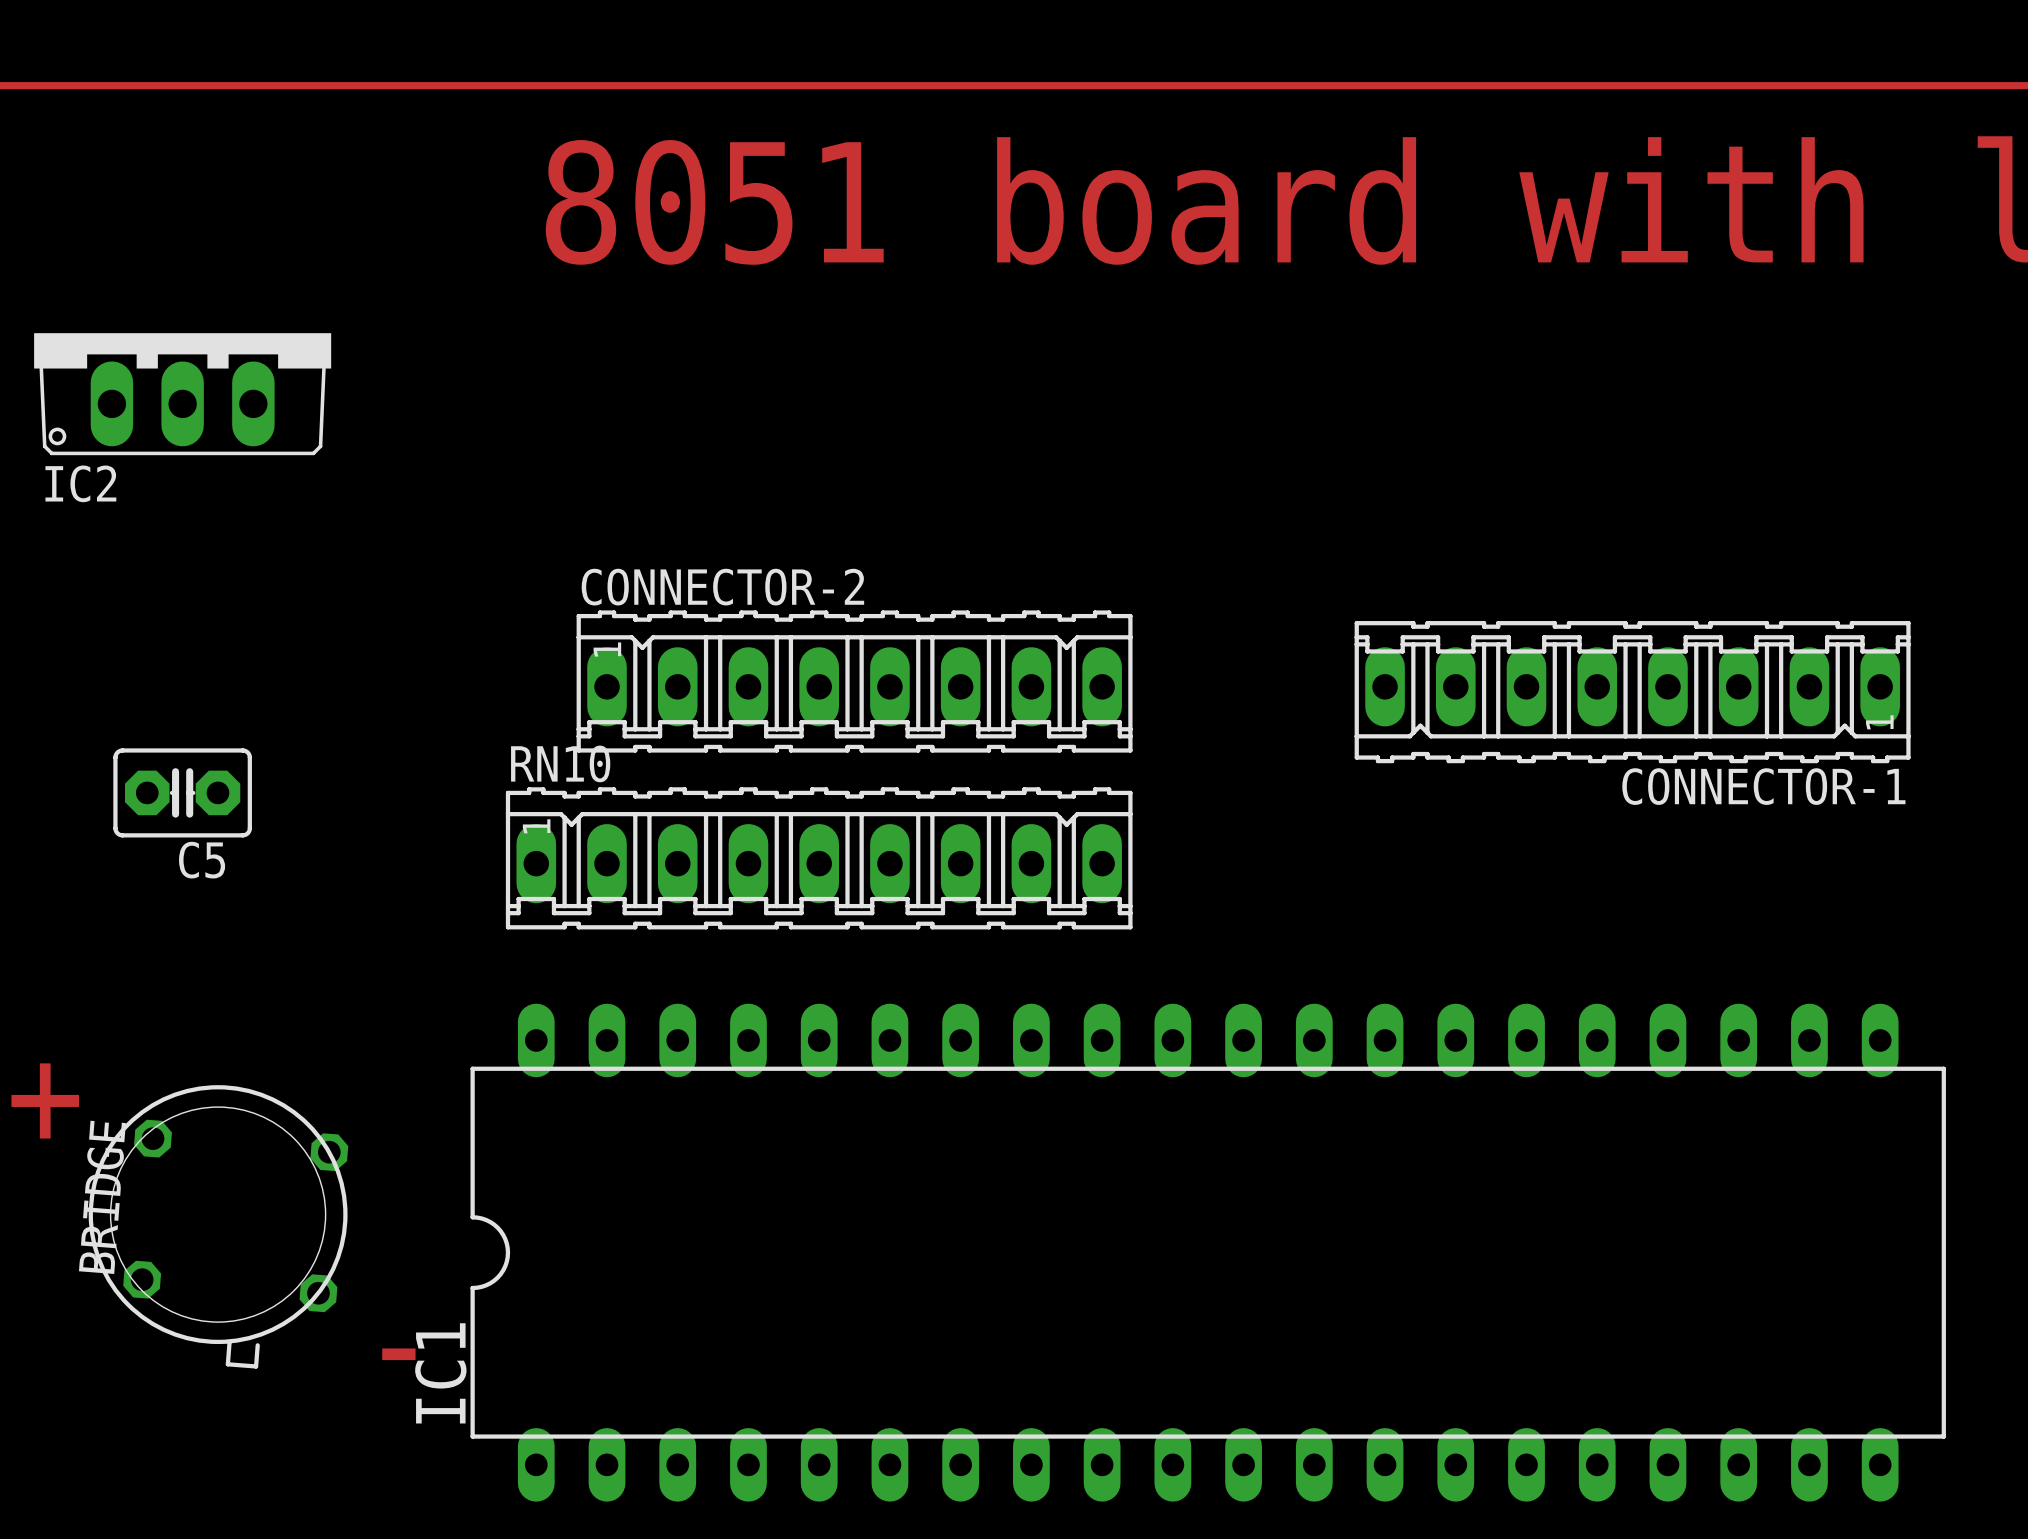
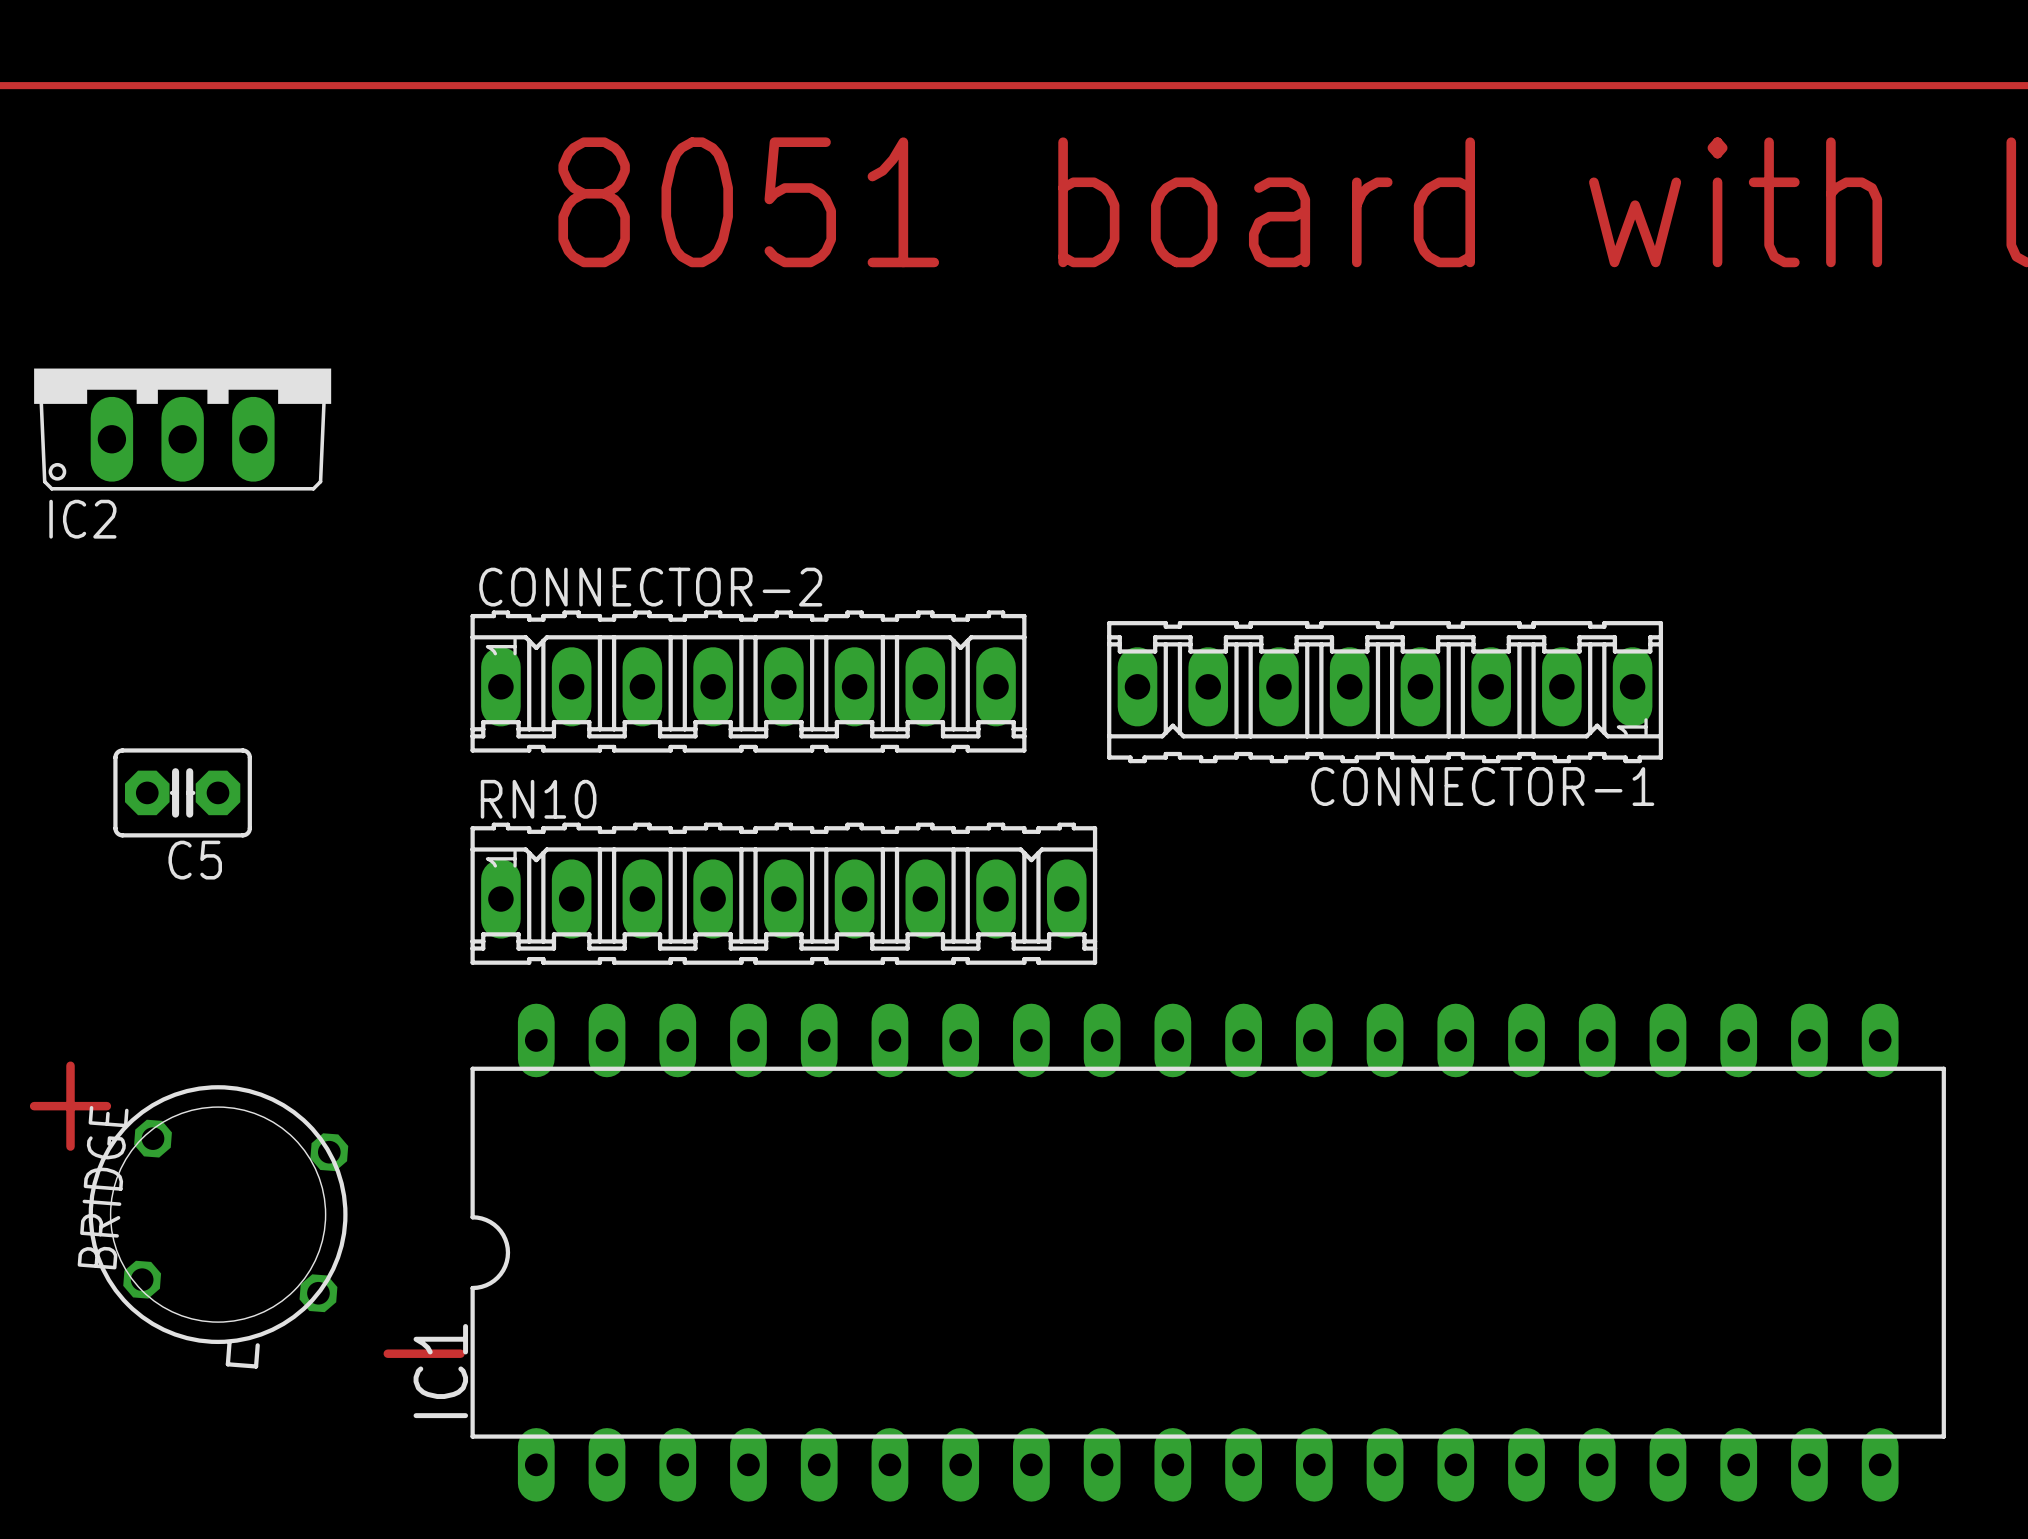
IC2 position: (182, 394) -> (182, 429)
CONNECTOR-2 position: (854, 681) -> (748, 681)
CONNECTOR-1 position: (1632, 692) -> (1385, 692)
RN10 position: (819, 858) -> (783, 893)

